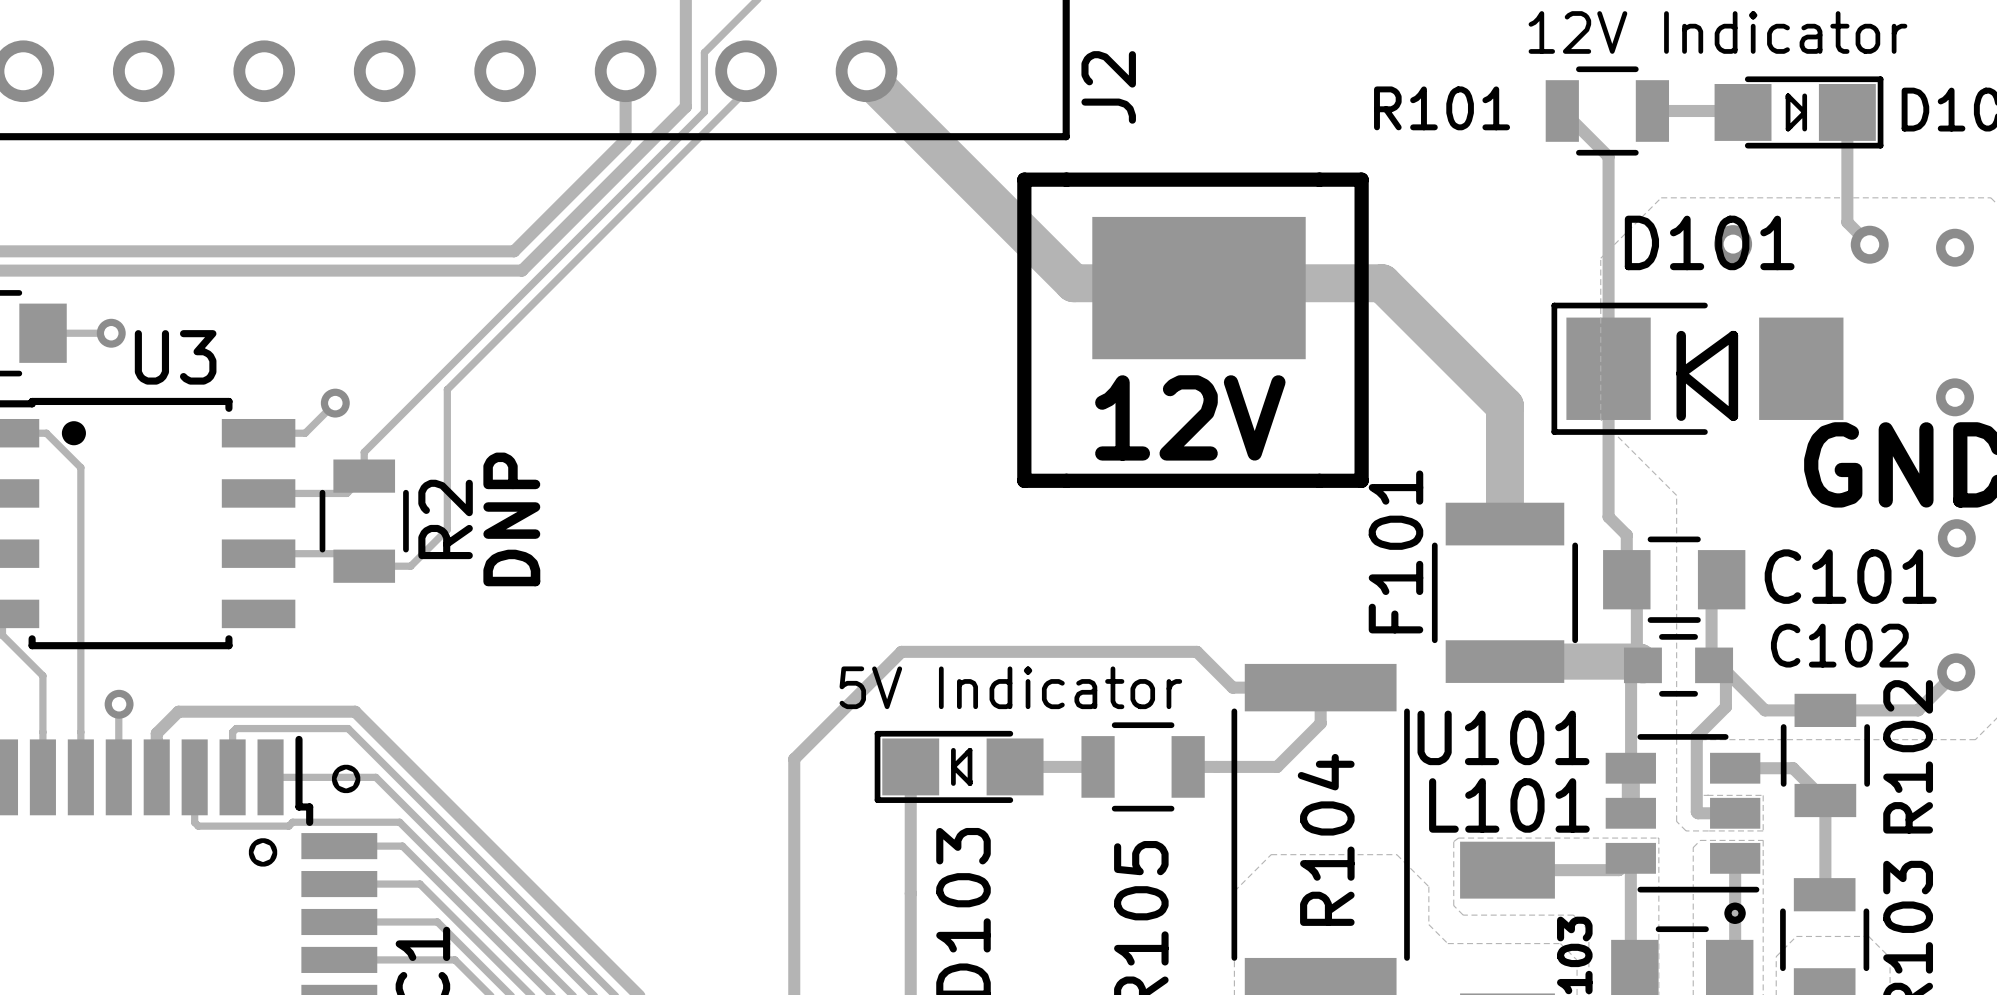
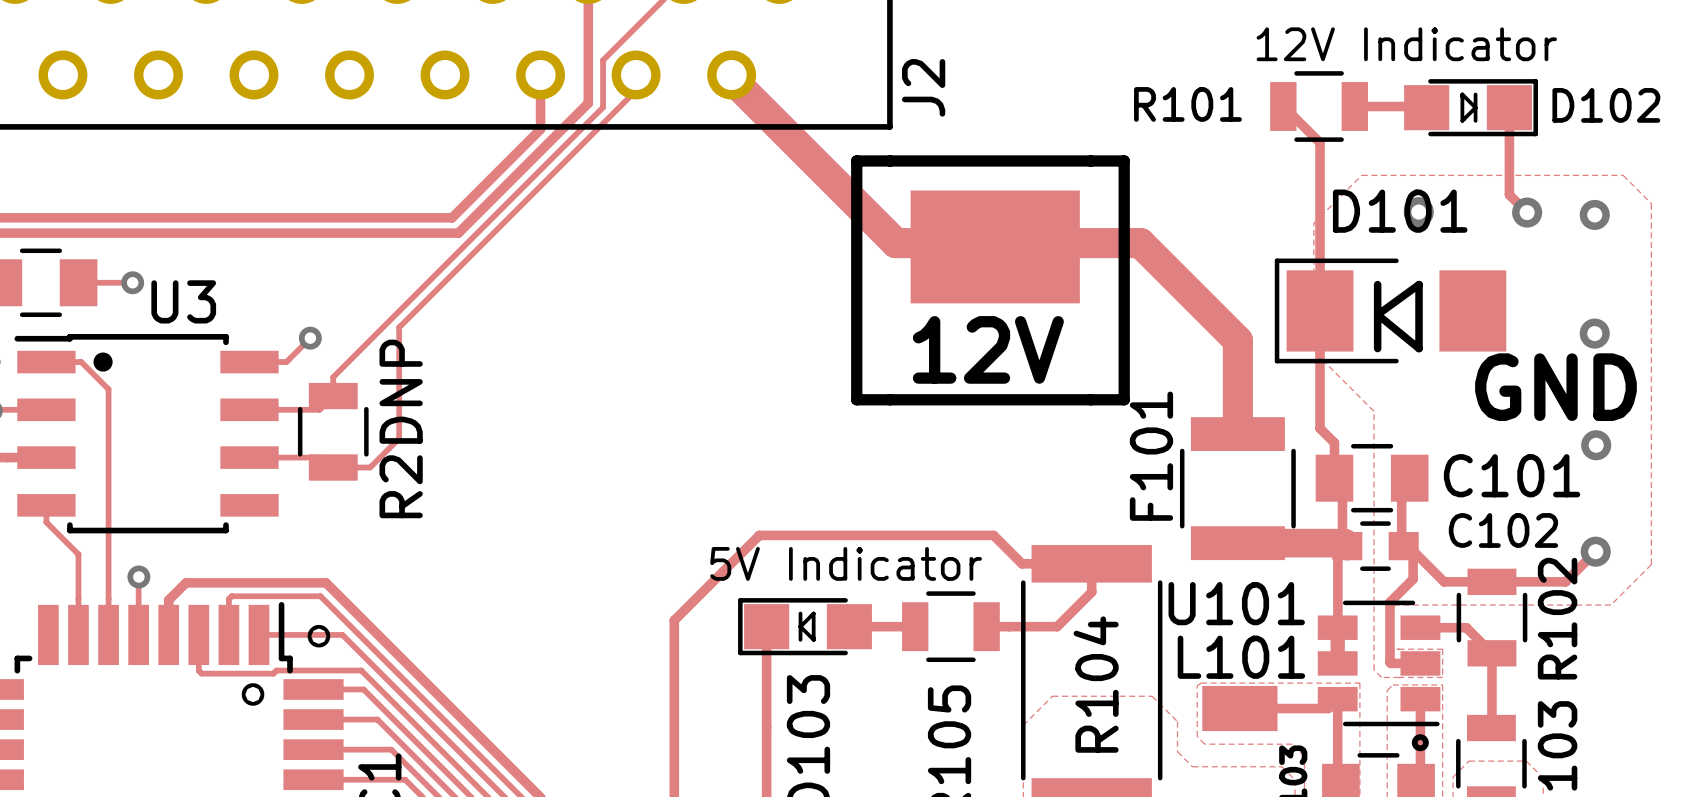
R2 name position: R2 (445, 519) -> R2 (401, 486)
text position: DNP (511, 519) -> DNP (401, 391)

